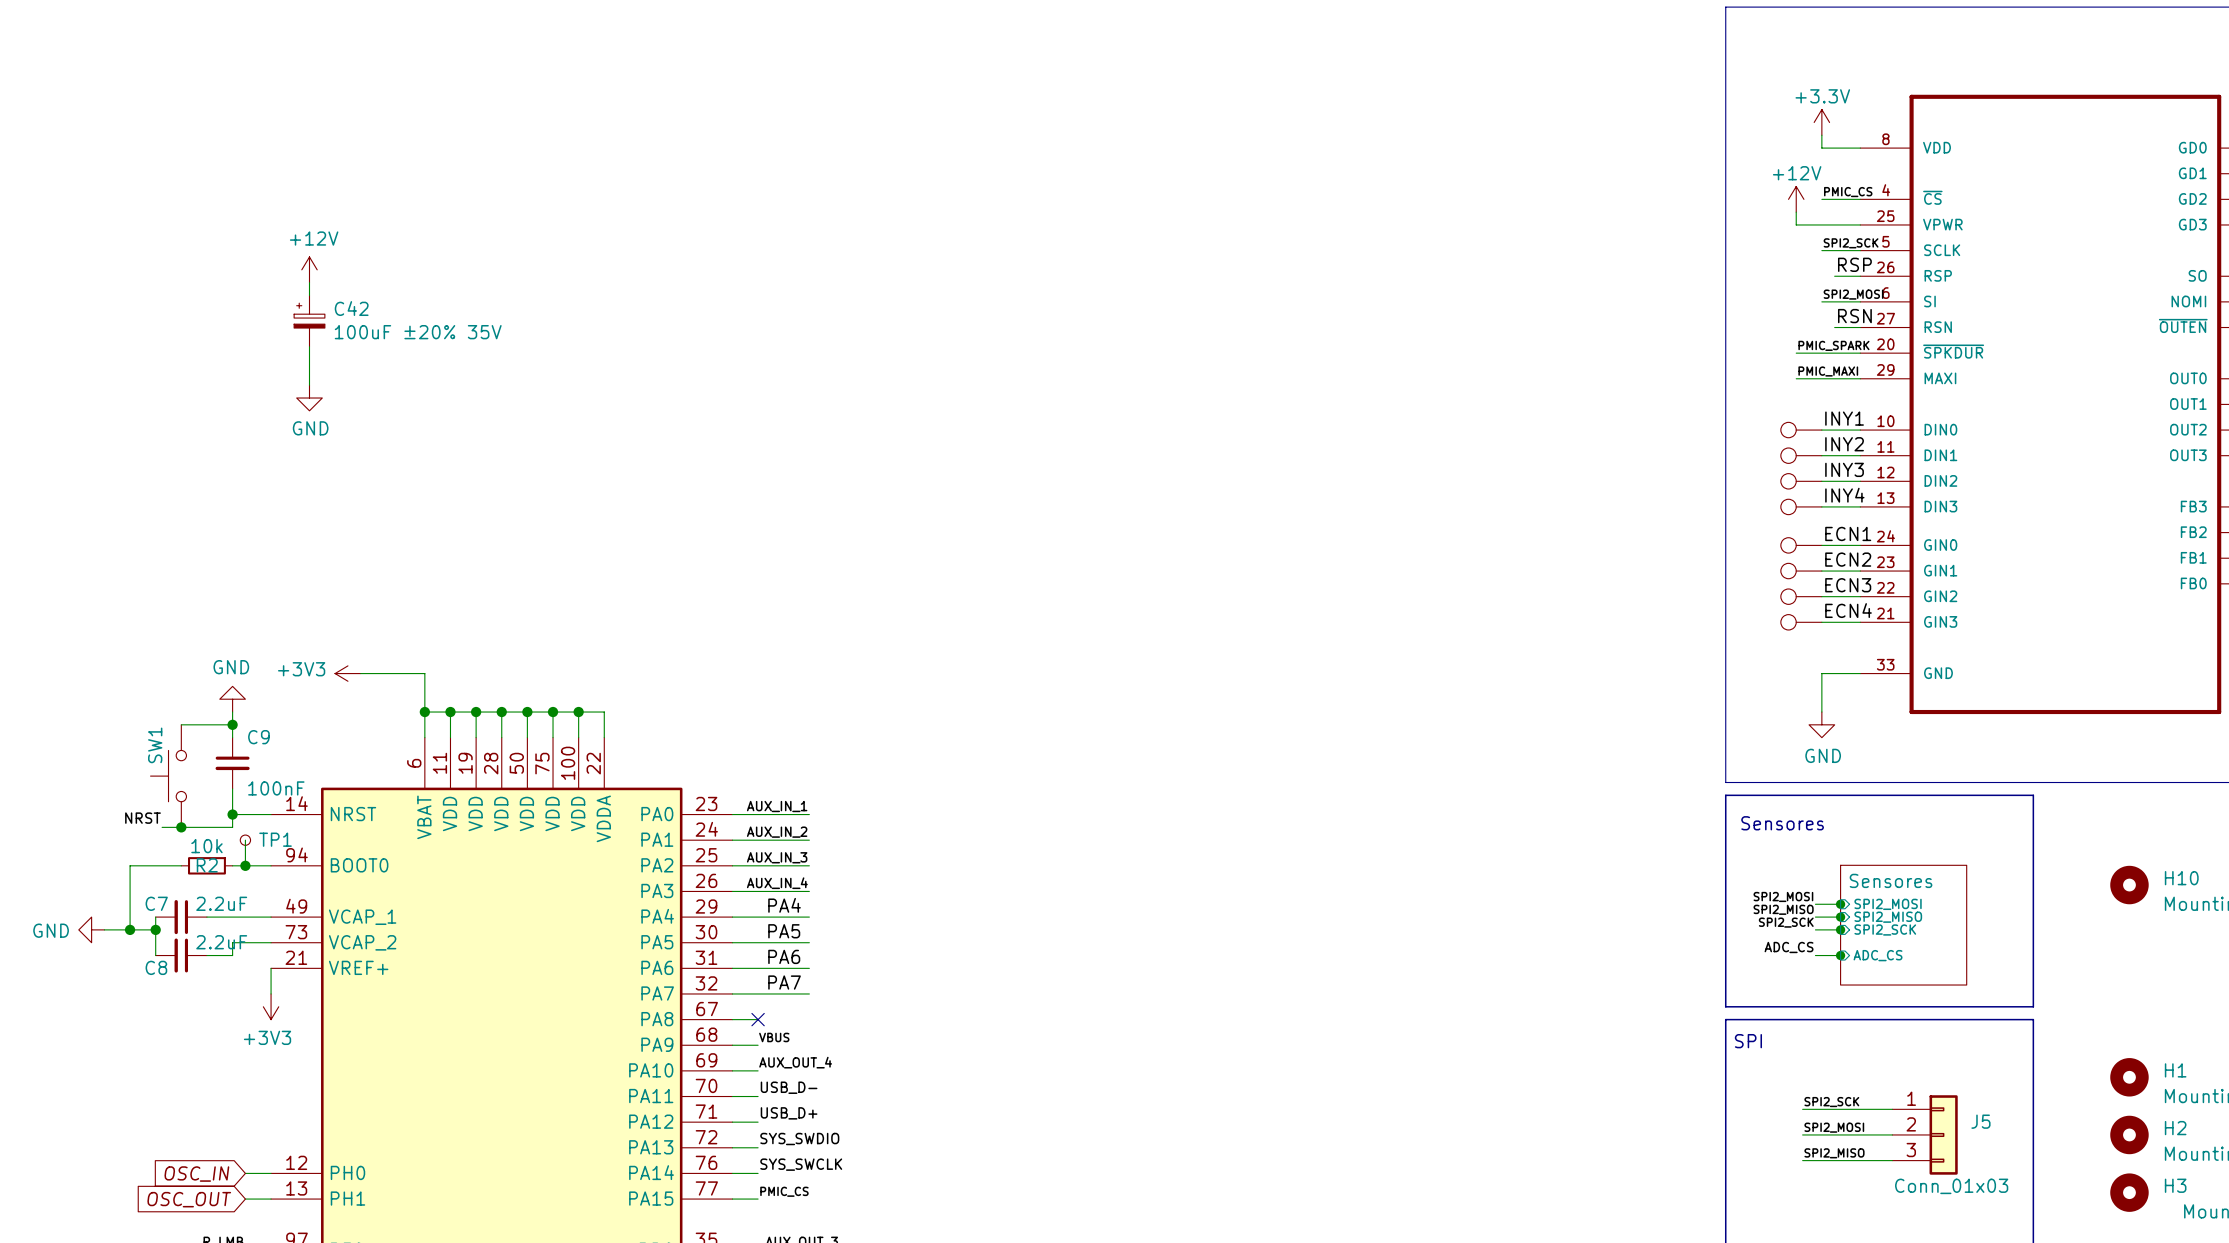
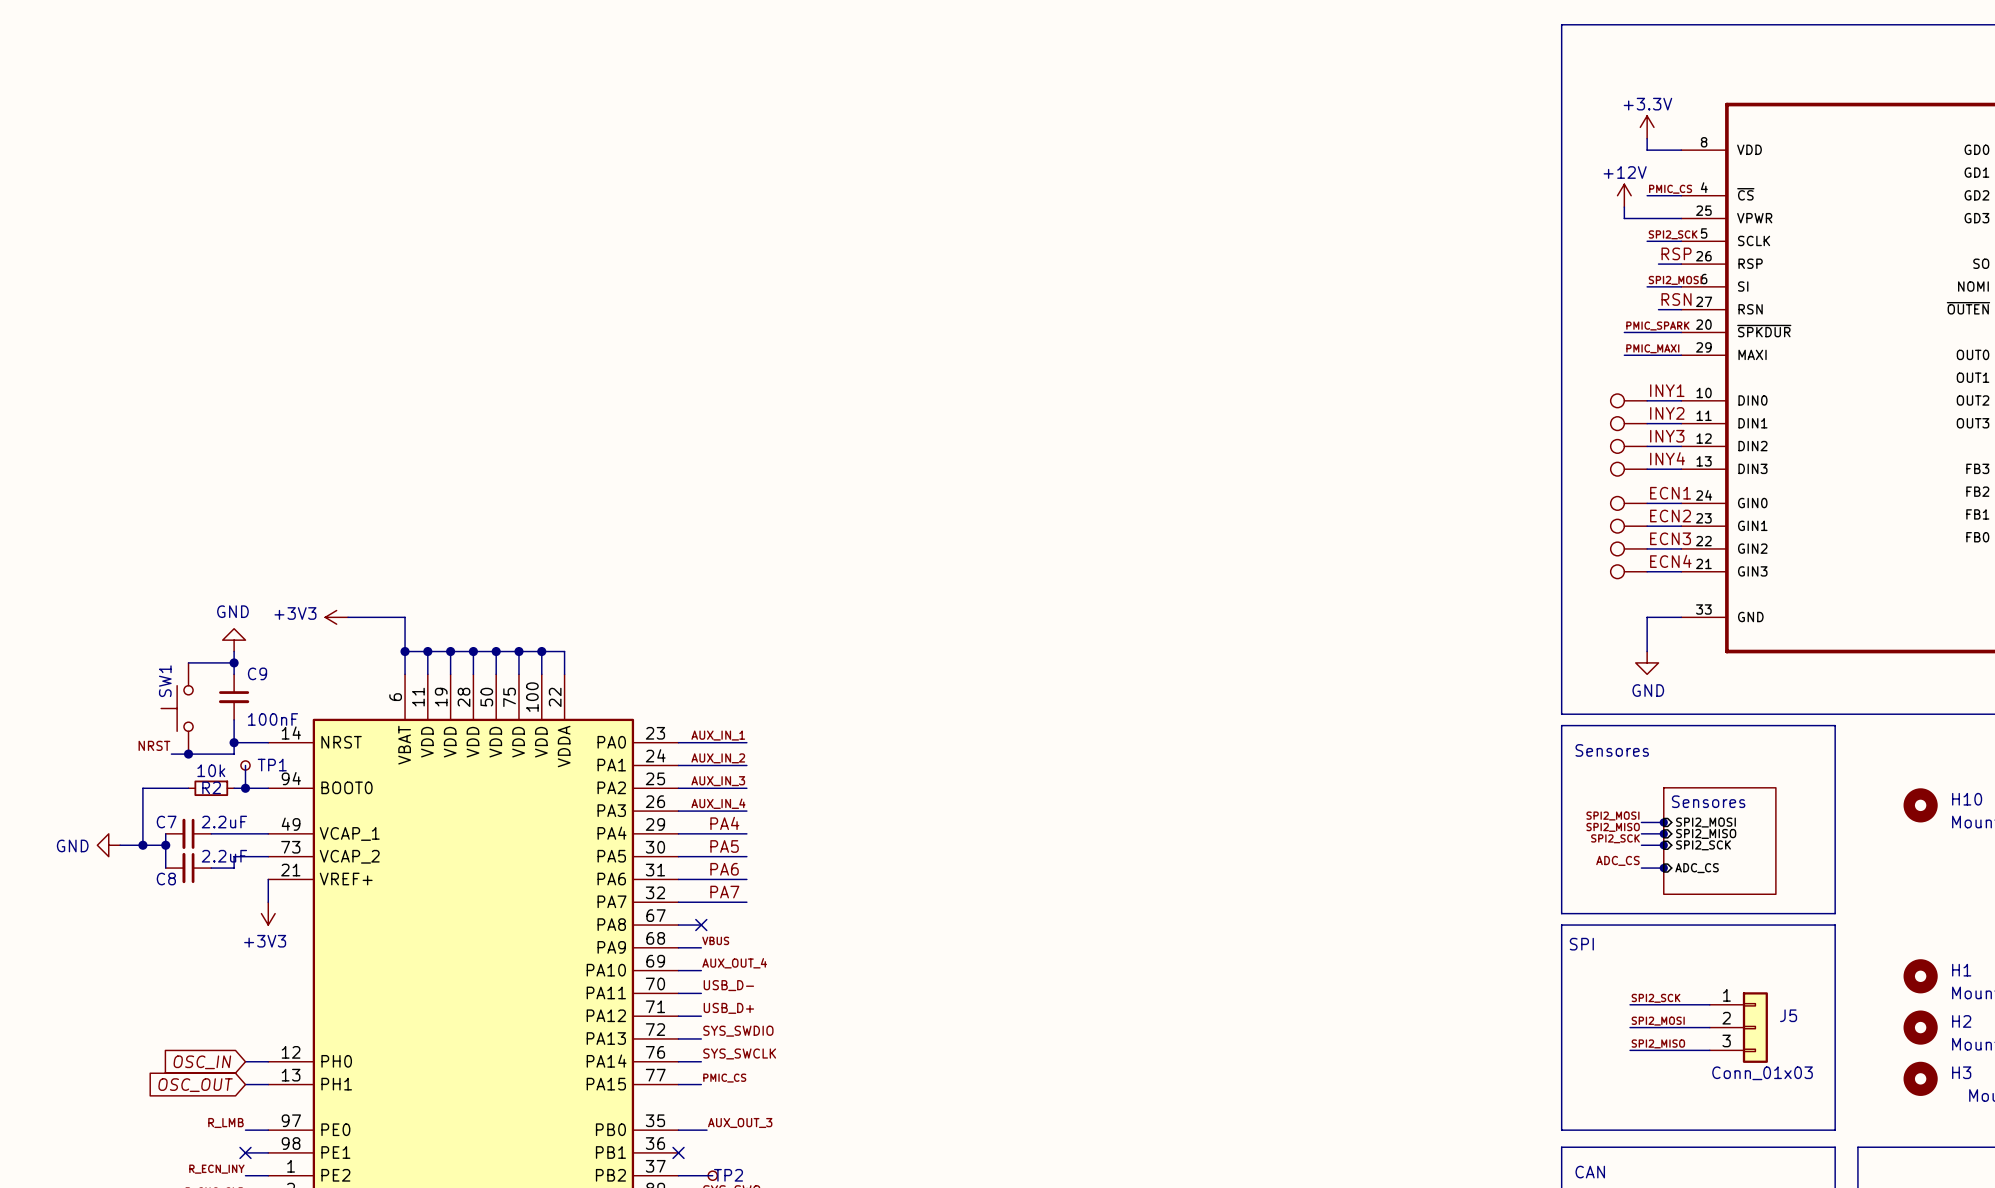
power symbol: +12V (309, 269) -> none
wire: (309, 282) (309, 295) -> none
C42: 100uF ±20% 35V (309, 321) -> none
wire: (309, 346) (309, 385) -> none
power symbol: GND (309, 398) -> none

